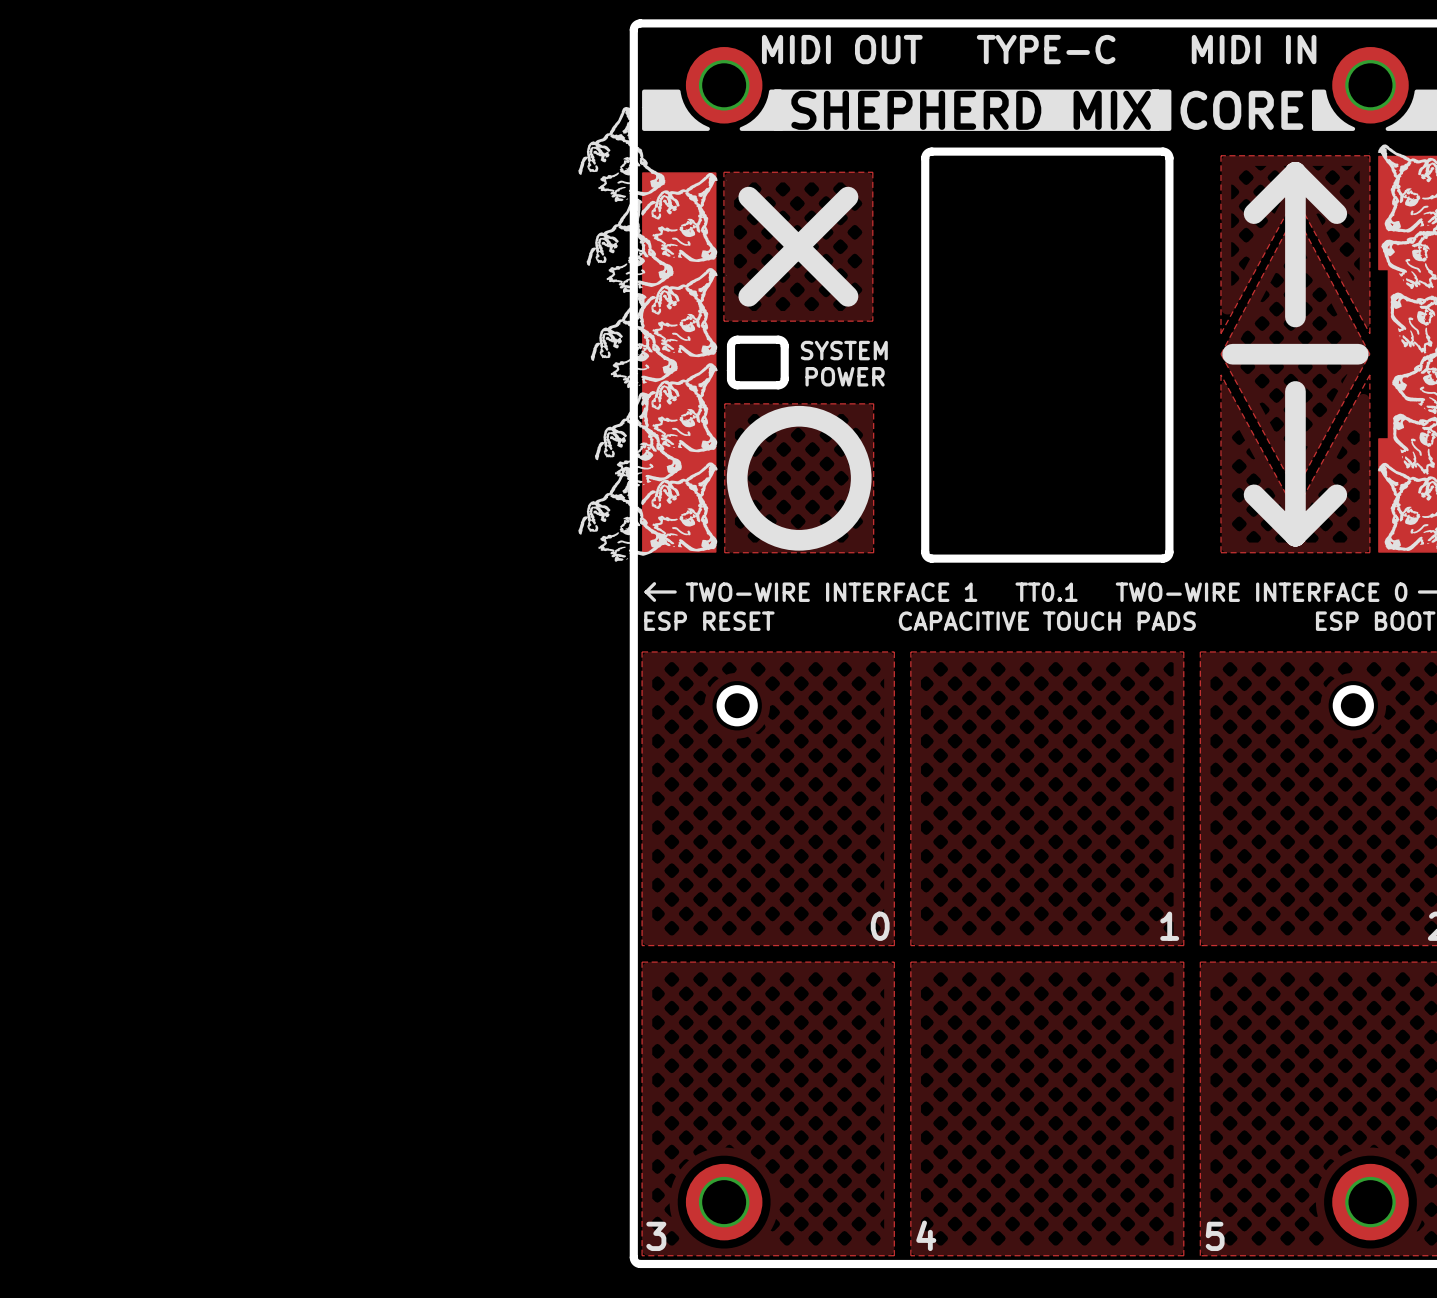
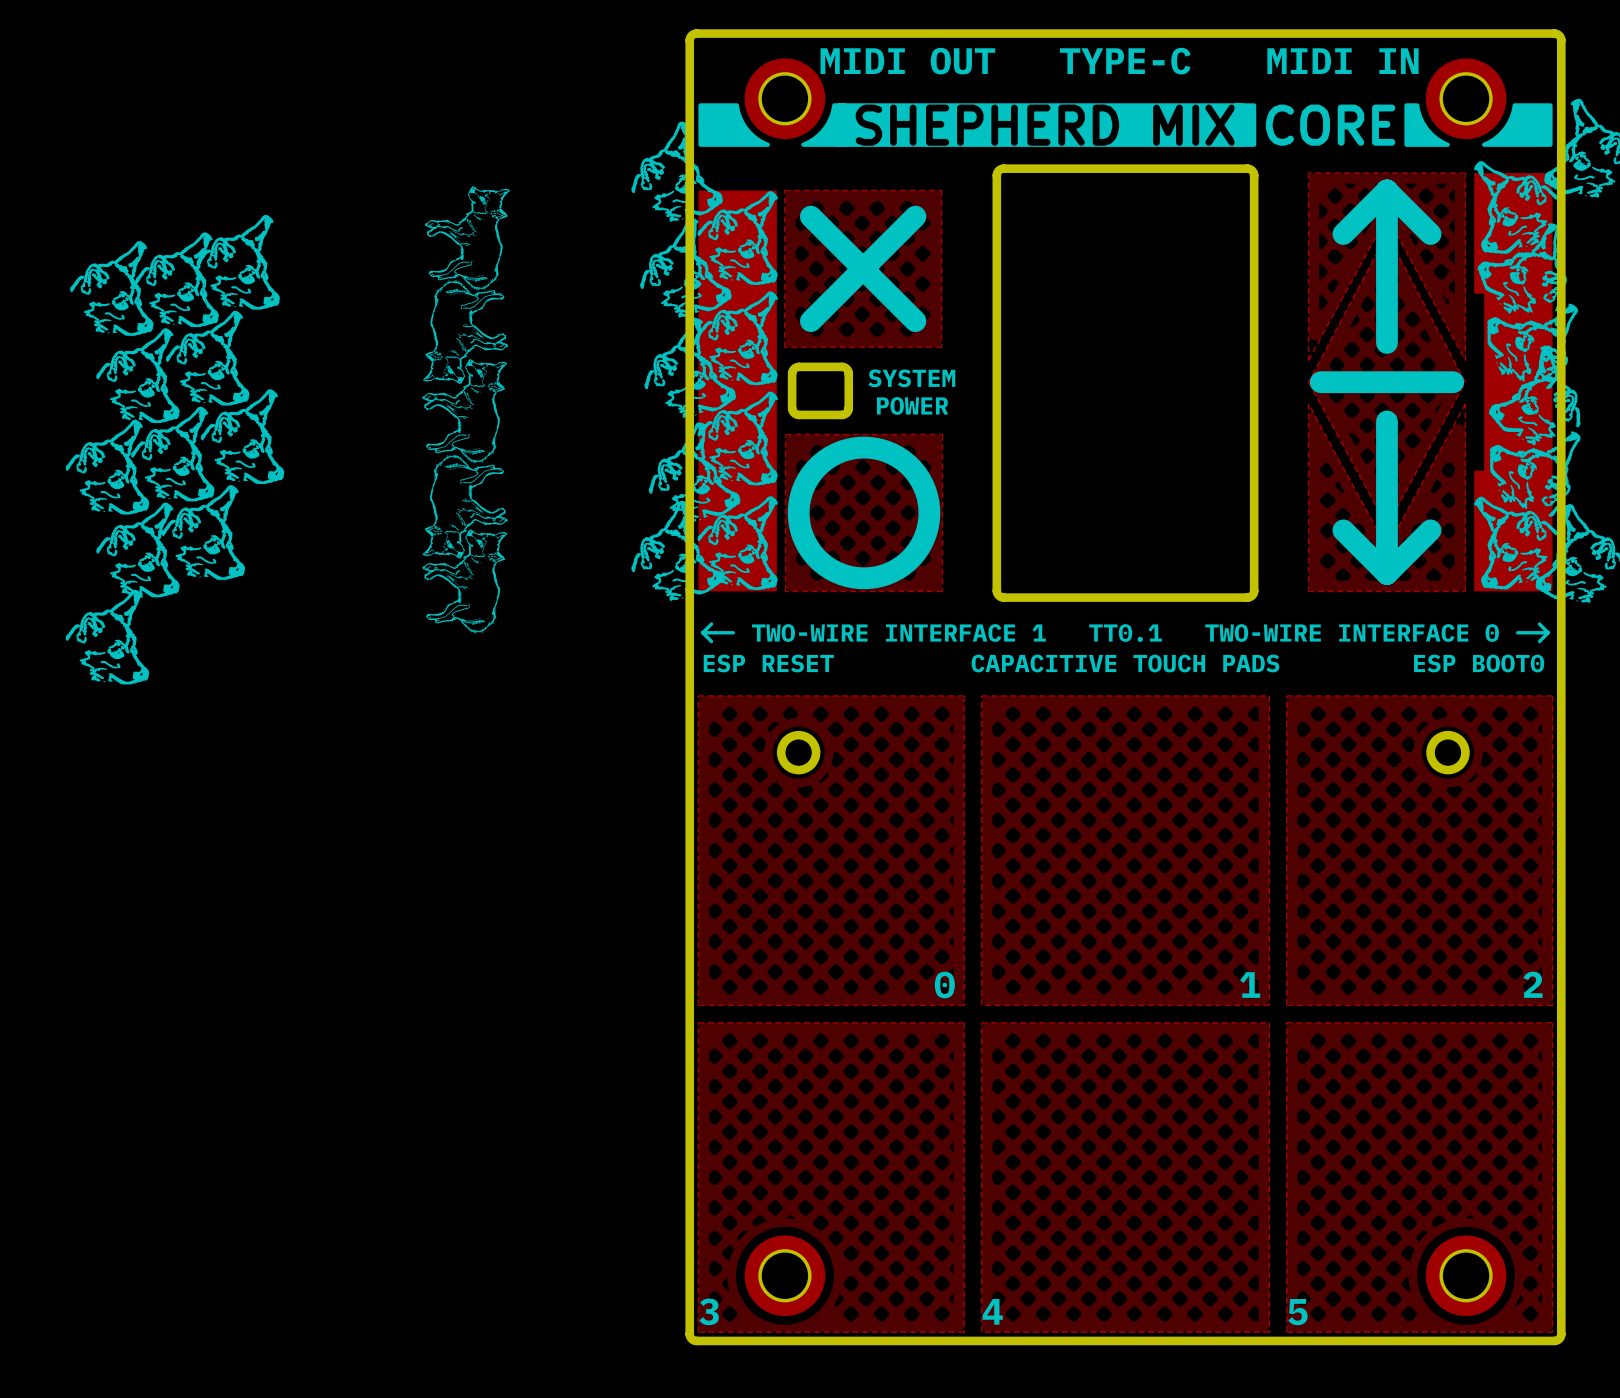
drawing: none -> [422, 186, 510, 634]
drawing: none -> [65, 215, 288, 685]

